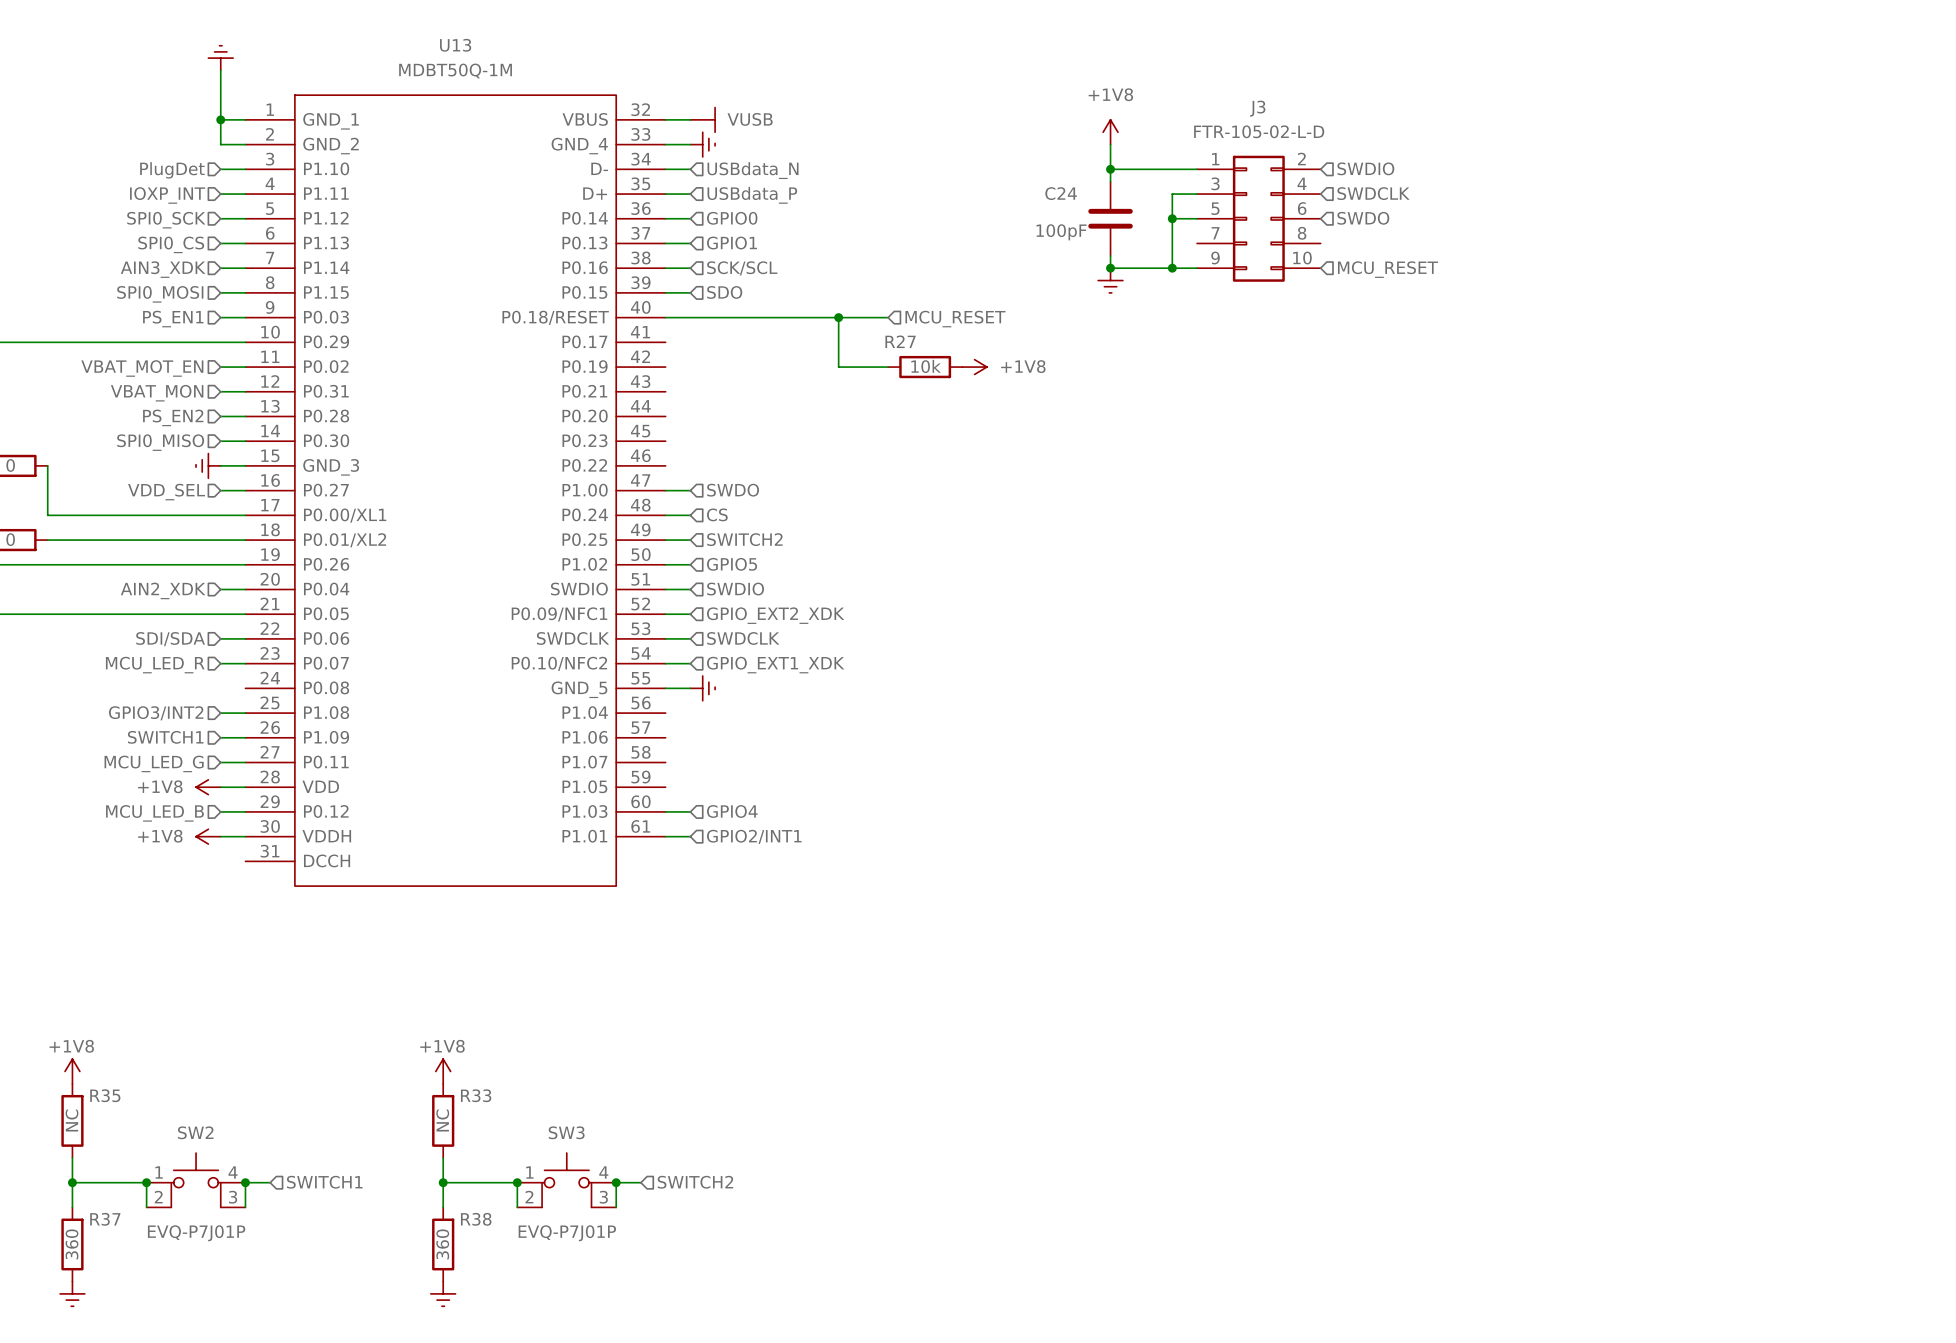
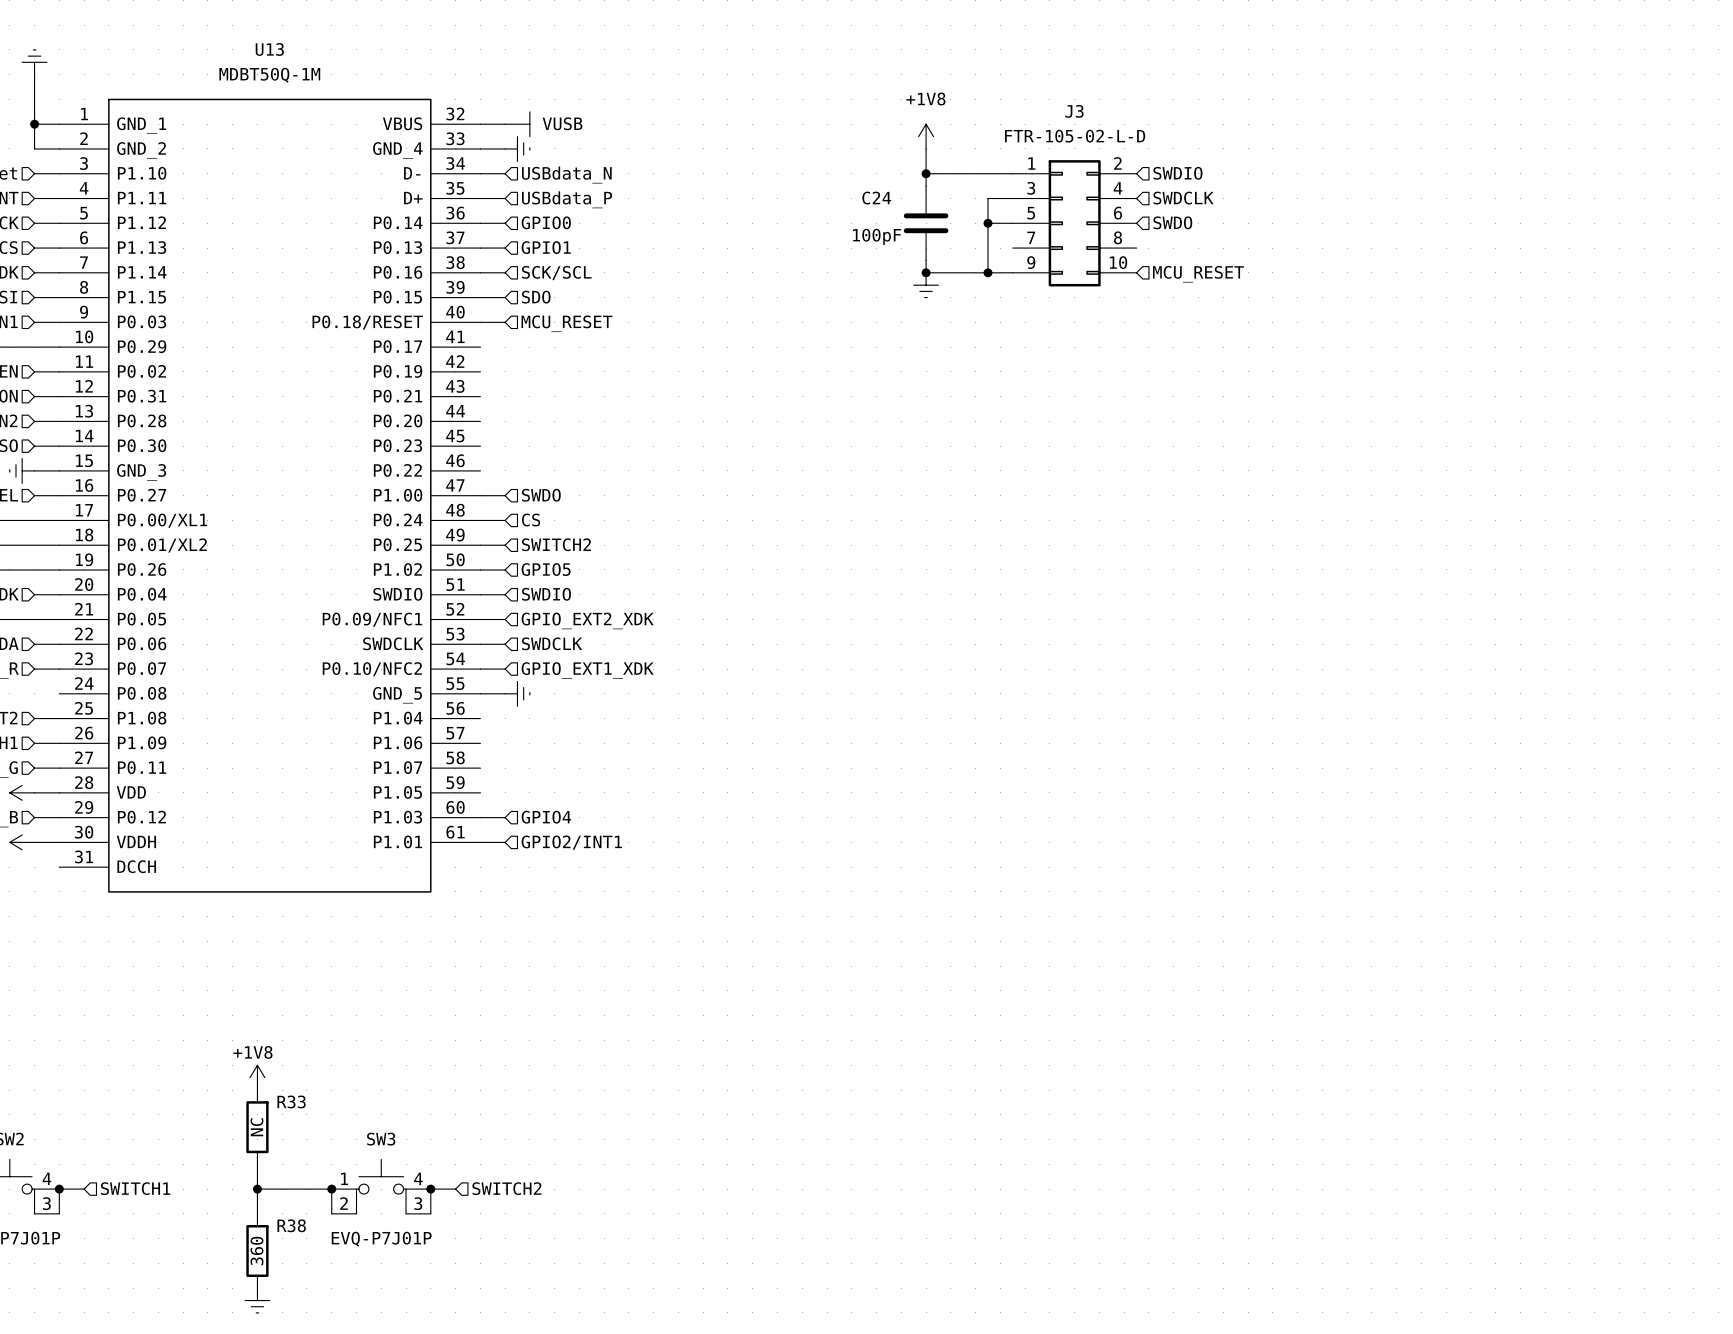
wire: (690, 317) (888, 317) -> none
wire: (838, 317) (838, 367) (888, 367) -> none
junction: (838, 317) -> none
hierarchical label position: MCU_RESET (955, 319) -> MCU_RESET (566, 323)
R27: 10k (925, 367) -> none
power symbol: +1V8 (974, 367) -> none

